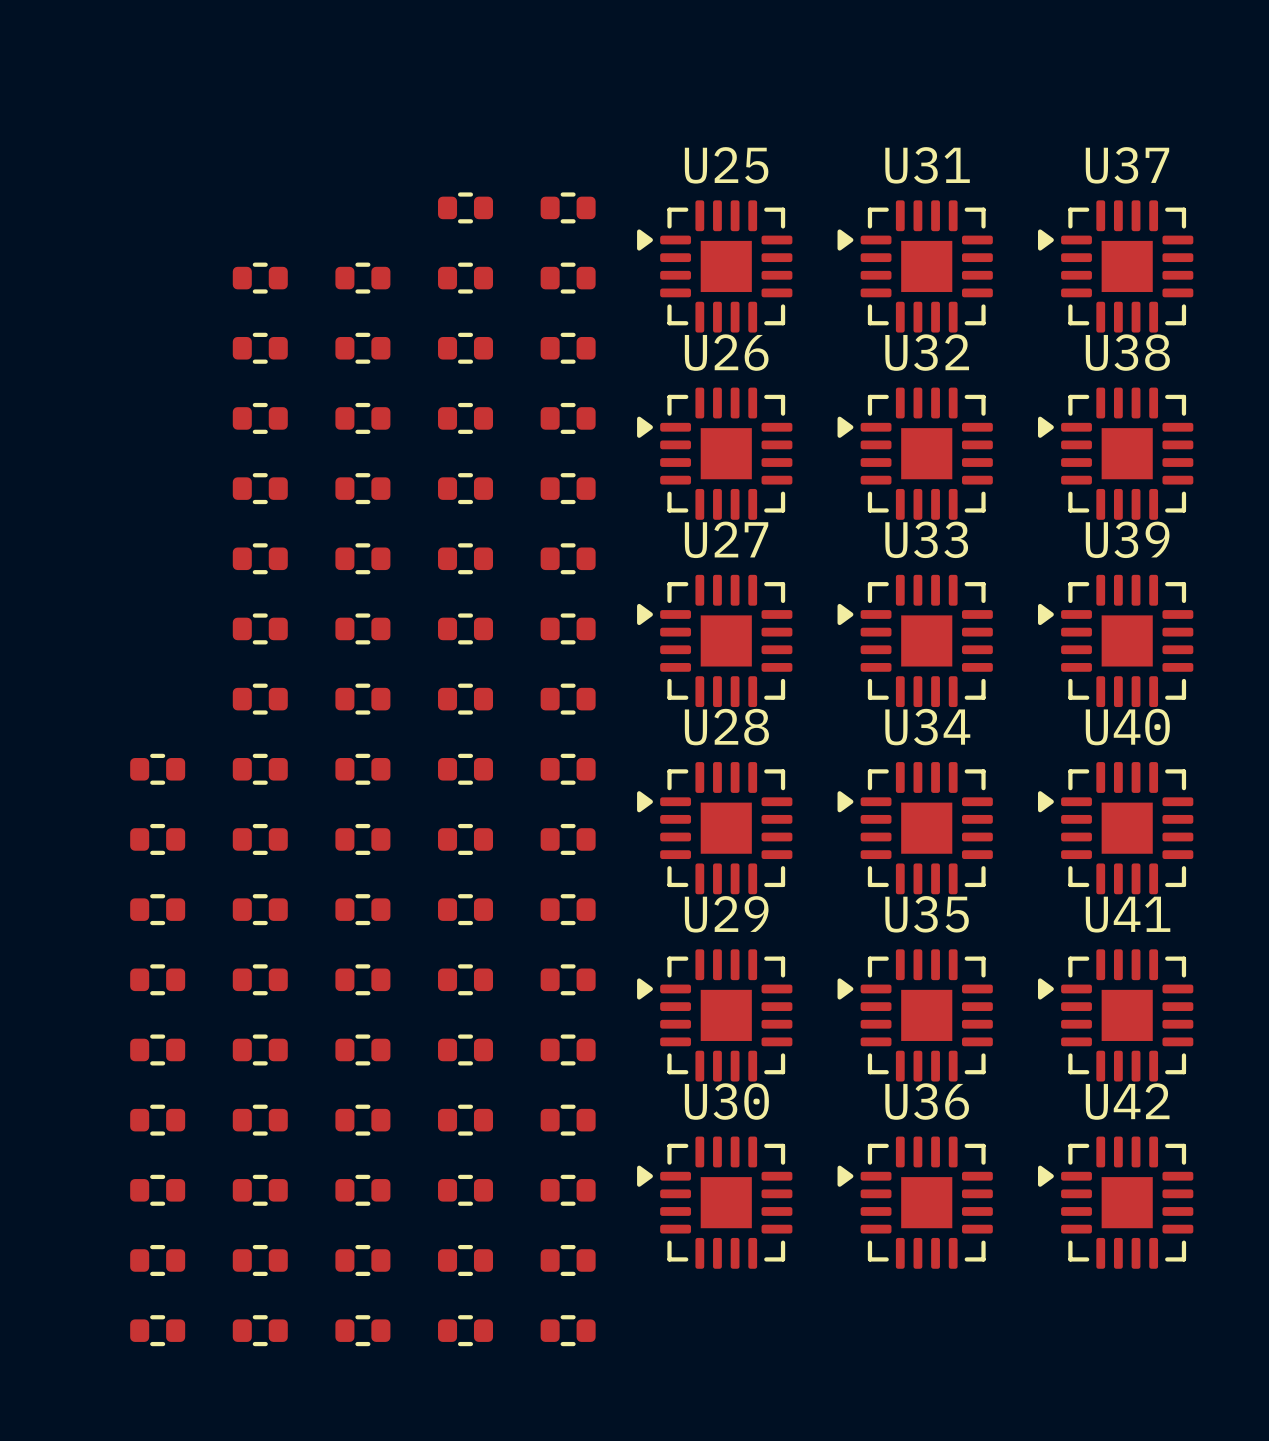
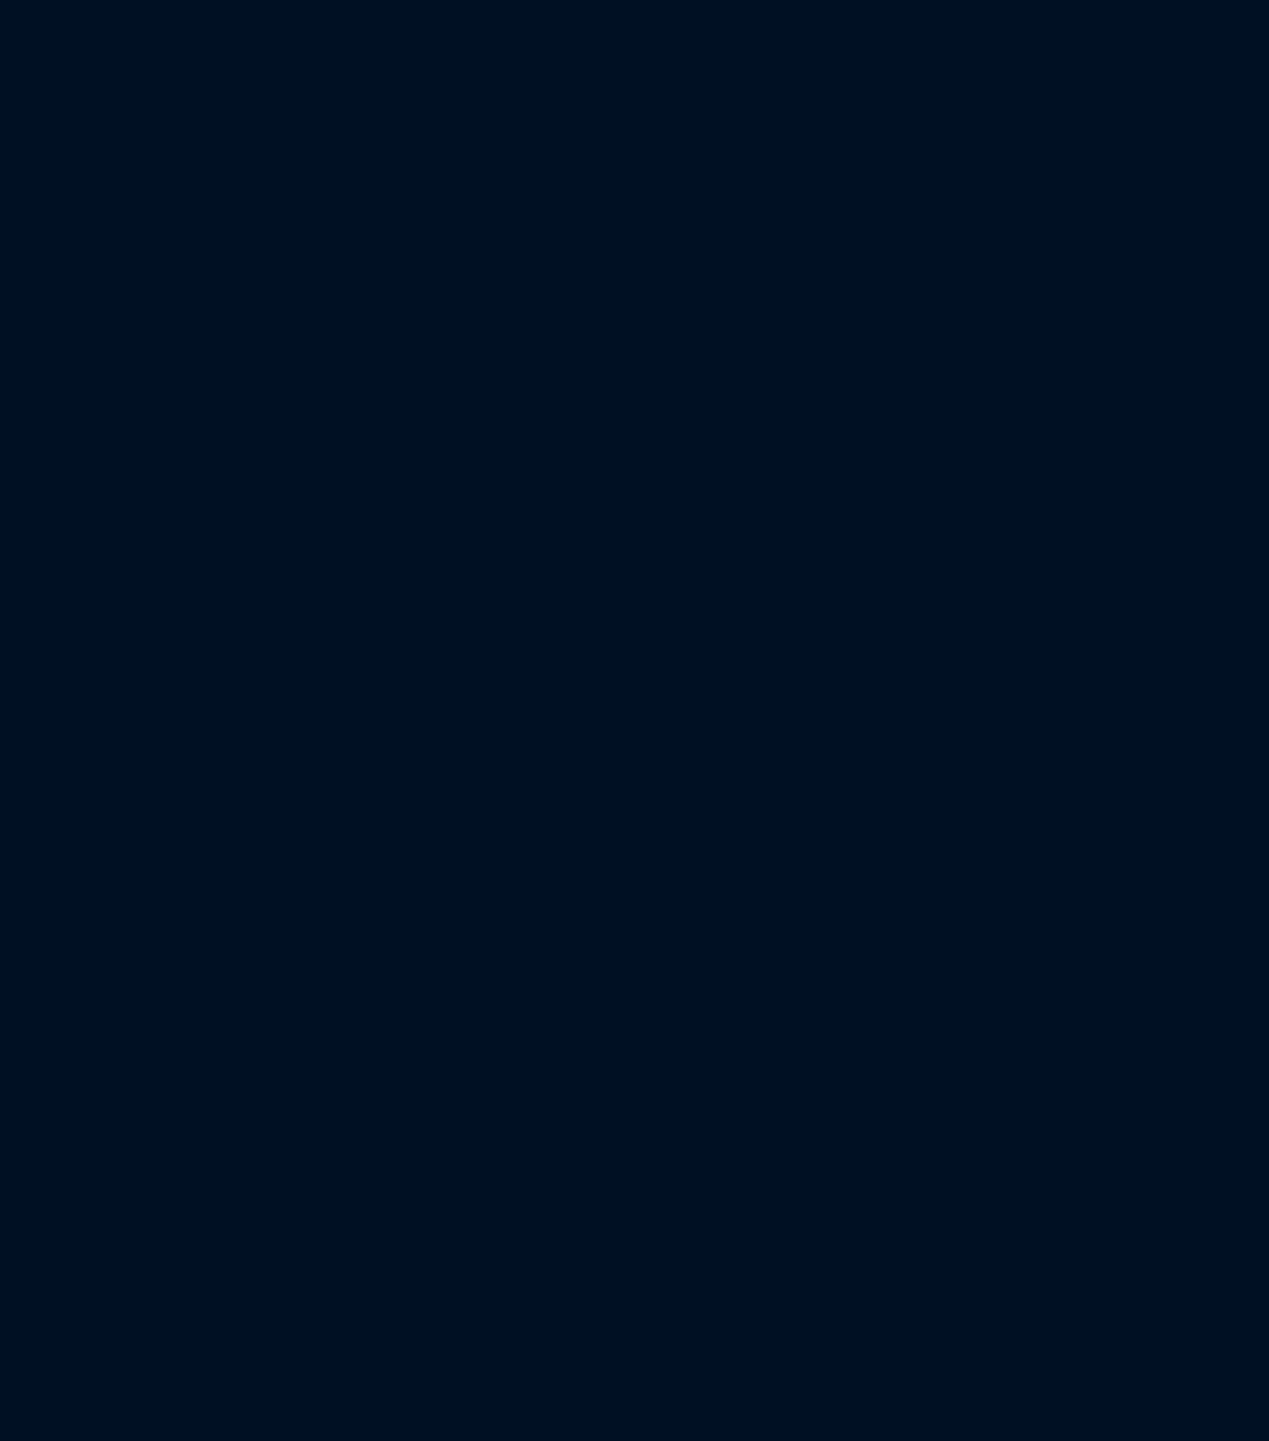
part: (465, 207) -> none
part: (568, 207) -> none
U25: (714, 266) -> none
U31: (915, 266) -> none
U37: (1115, 266) -> none
part: (260, 278) -> none
part: (362, 278) -> none
part: (465, 278) -> none
part: (568, 278) -> none
part: (260, 348) -> none
part: (362, 348) -> none
part: (465, 348) -> none
part: (568, 348) -> none
part: (260, 418) -> none
part: (362, 418) -> none
part: (465, 418) -> none
part: (568, 418) -> none
U26: (714, 453) -> none
U32: (915, 453) -> none
U38: (1115, 453) -> none
part: (260, 488) -> none
part: (362, 488) -> none
part: (465, 488) -> none
part: (568, 488) -> none
part: (260, 558) -> none
part: (362, 558) -> none
part: (465, 558) -> none
part: (568, 558) -> none
part: (260, 628) -> none
part: (362, 628) -> none
part: (465, 628) -> none
part: (568, 628) -> none
U27: (714, 640) -> none
U33: (915, 640) -> none
U39: (1115, 640) -> none
part: (260, 699) -> none
part: (362, 699) -> none
part: (465, 699) -> none
part: (568, 699) -> none
part: (157, 769) -> none
part: (260, 769) -> none
part: (362, 769) -> none
part: (465, 769) -> none
part: (568, 769) -> none
U28: (714, 828) -> none
U34: (915, 828) -> none
U40: (1115, 828) -> none
part: (157, 839) -> none
part: (260, 839) -> none
part: (362, 839) -> none
part: (465, 839) -> none
part: (568, 839) -> none
part: (157, 909) -> none
part: (260, 909) -> none
part: (362, 909) -> none
part: (465, 909) -> none
part: (568, 909) -> none
part: (157, 979) -> none
part: (260, 979) -> none
part: (362, 979) -> none
part: (465, 979) -> none
part: (568, 979) -> none
U29: (714, 1015) -> none
U35: (915, 1015) -> none
U41: (1115, 1015) -> none
part: (157, 1049) -> none
part: (260, 1049) -> none
part: (362, 1049) -> none
part: (465, 1049) -> none
part: (568, 1049) -> none
part: (157, 1120) -> none
part: (260, 1120) -> none
part: (362, 1120) -> none
part: (465, 1120) -> none
part: (568, 1120) -> none
part: (157, 1190) -> none
part: (260, 1190) -> none
part: (362, 1190) -> none
part: (465, 1190) -> none
part: (568, 1190) -> none
U30: (714, 1202) -> none
U36: (915, 1202) -> none
U42: (1115, 1202) -> none
part: (157, 1260) -> none
part: (260, 1260) -> none
part: (362, 1260) -> none
part: (465, 1260) -> none
part: (568, 1260) -> none
part: (157, 1330) -> none
part: (260, 1330) -> none
part: (362, 1330) -> none
part: (465, 1330) -> none
part: (568, 1330) -> none

